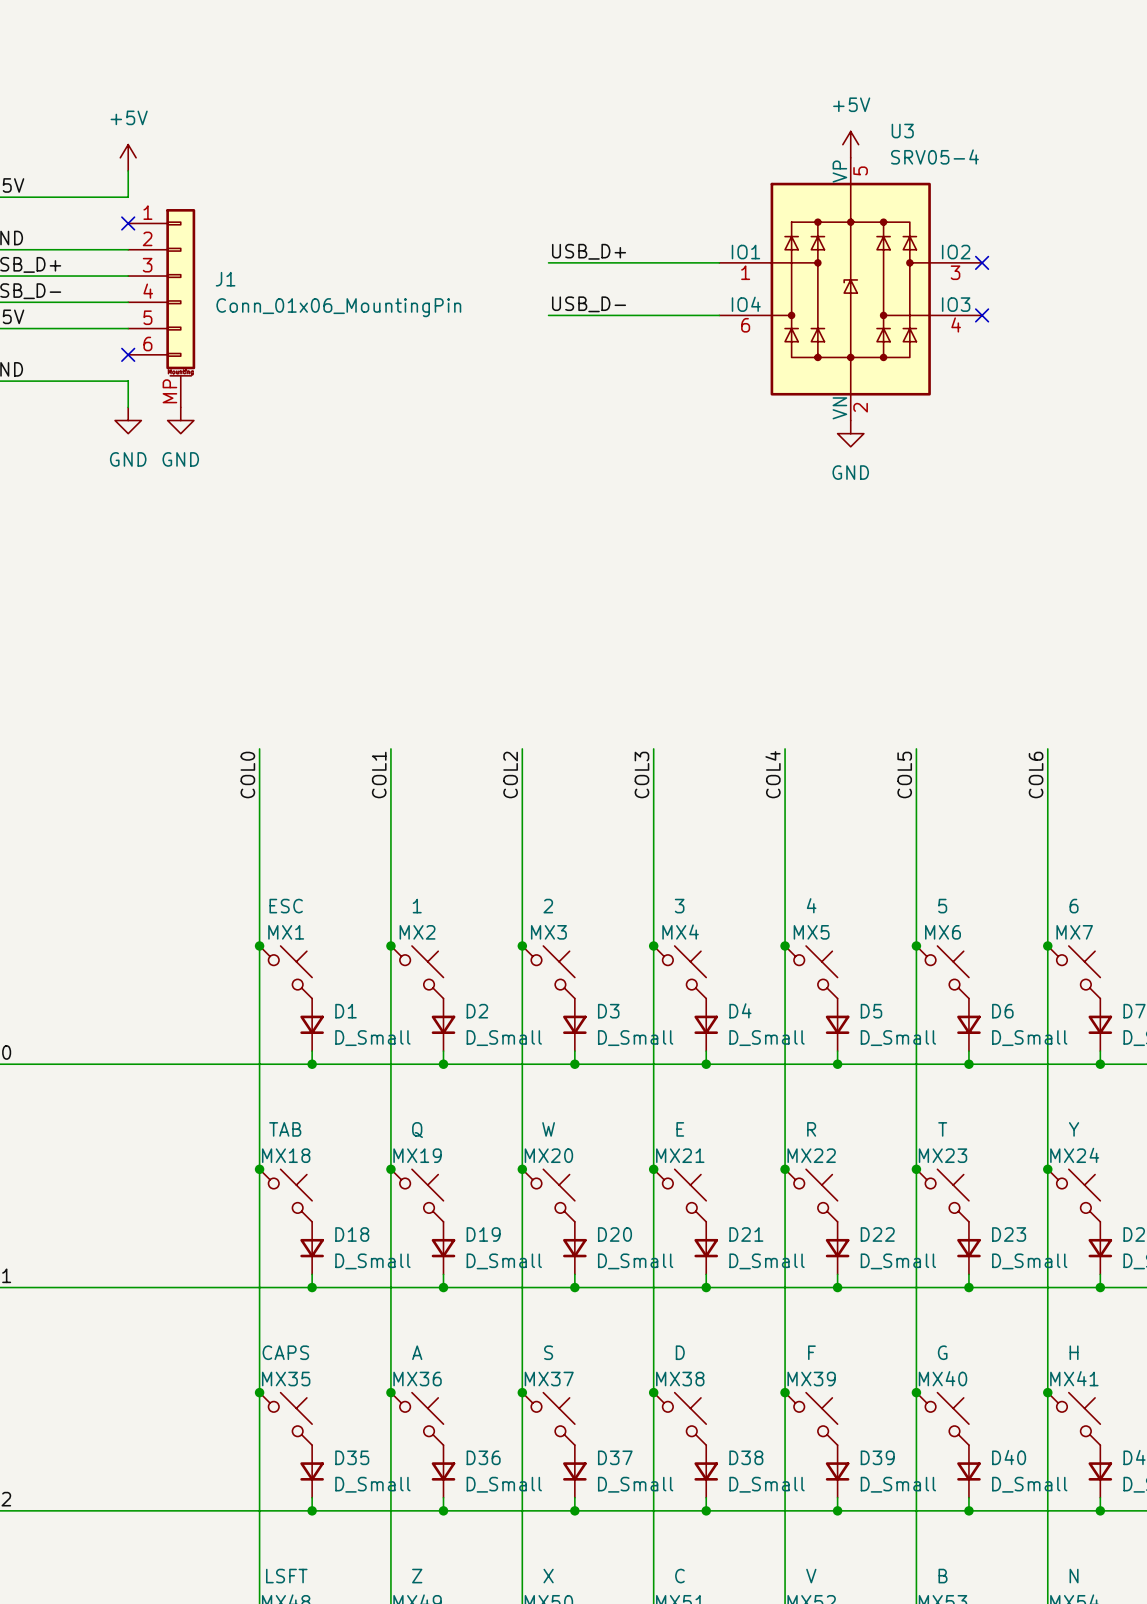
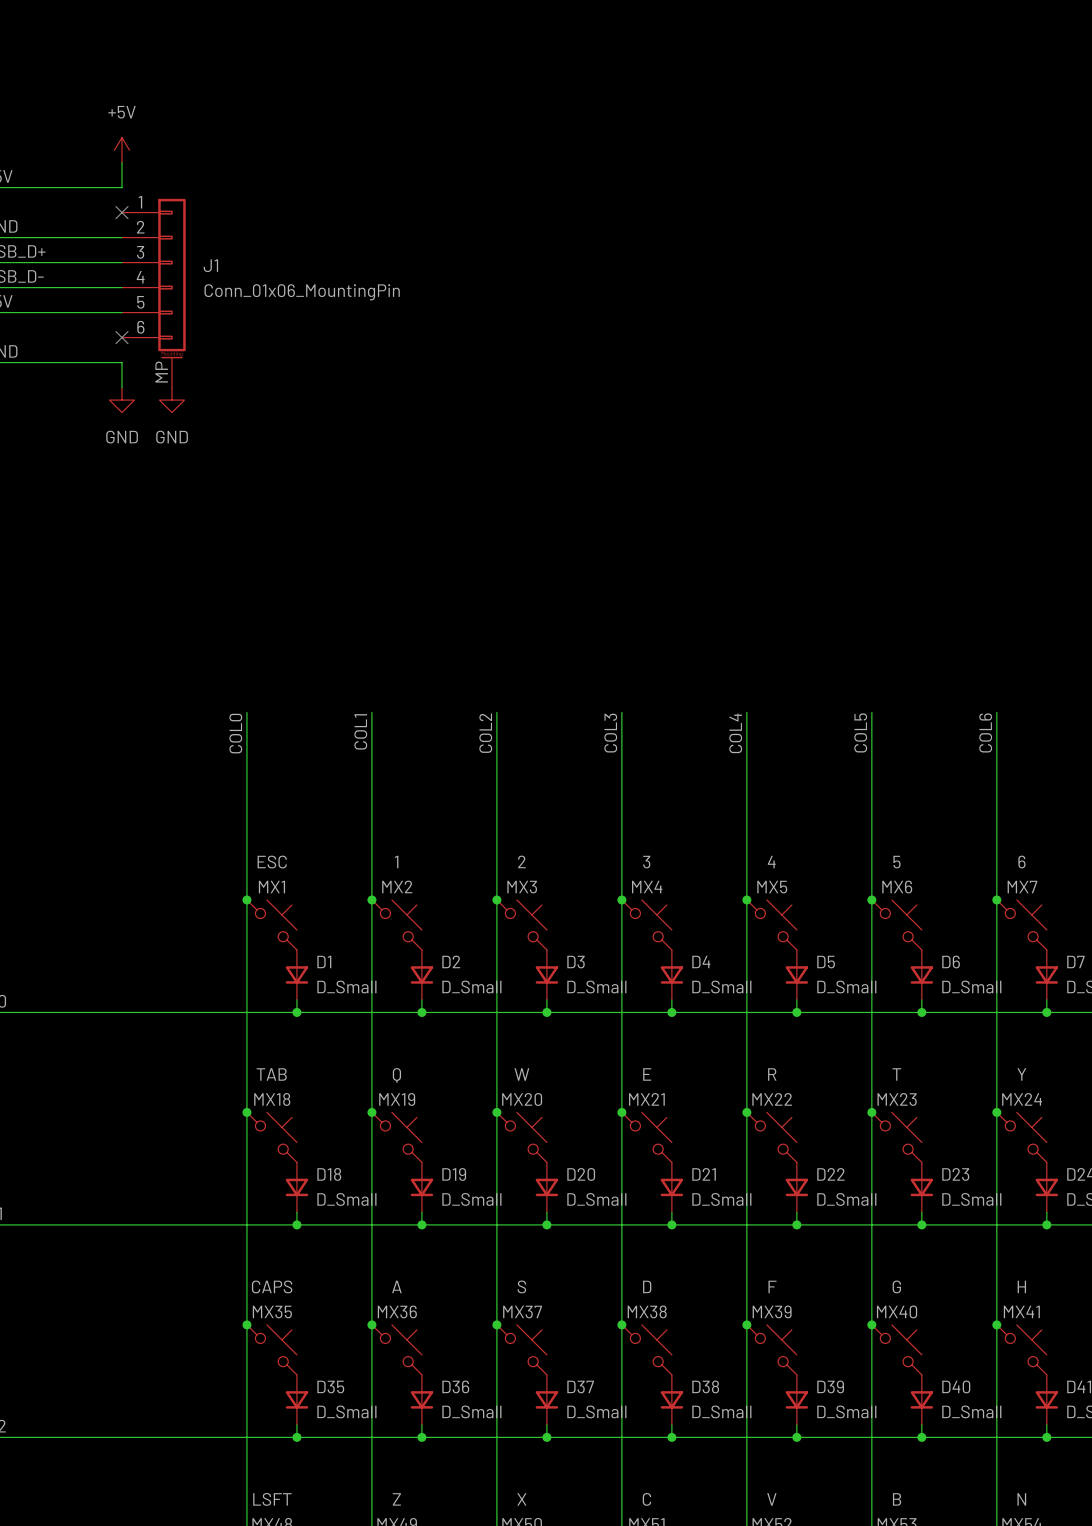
power symbol: +5V (850, 144) -> none
label: USB_D+ (589, 251) -> none
wire: (548, 262) (719, 262) -> none
no-connect mark: (982, 262) -> none
U3: SRV05-4 (850, 289) -> none
label: USB_D- (589, 304) -> none
wire: (548, 315) (719, 315) -> none
no-connect mark: (982, 315) -> none
power symbol: GND (850, 433) -> none

